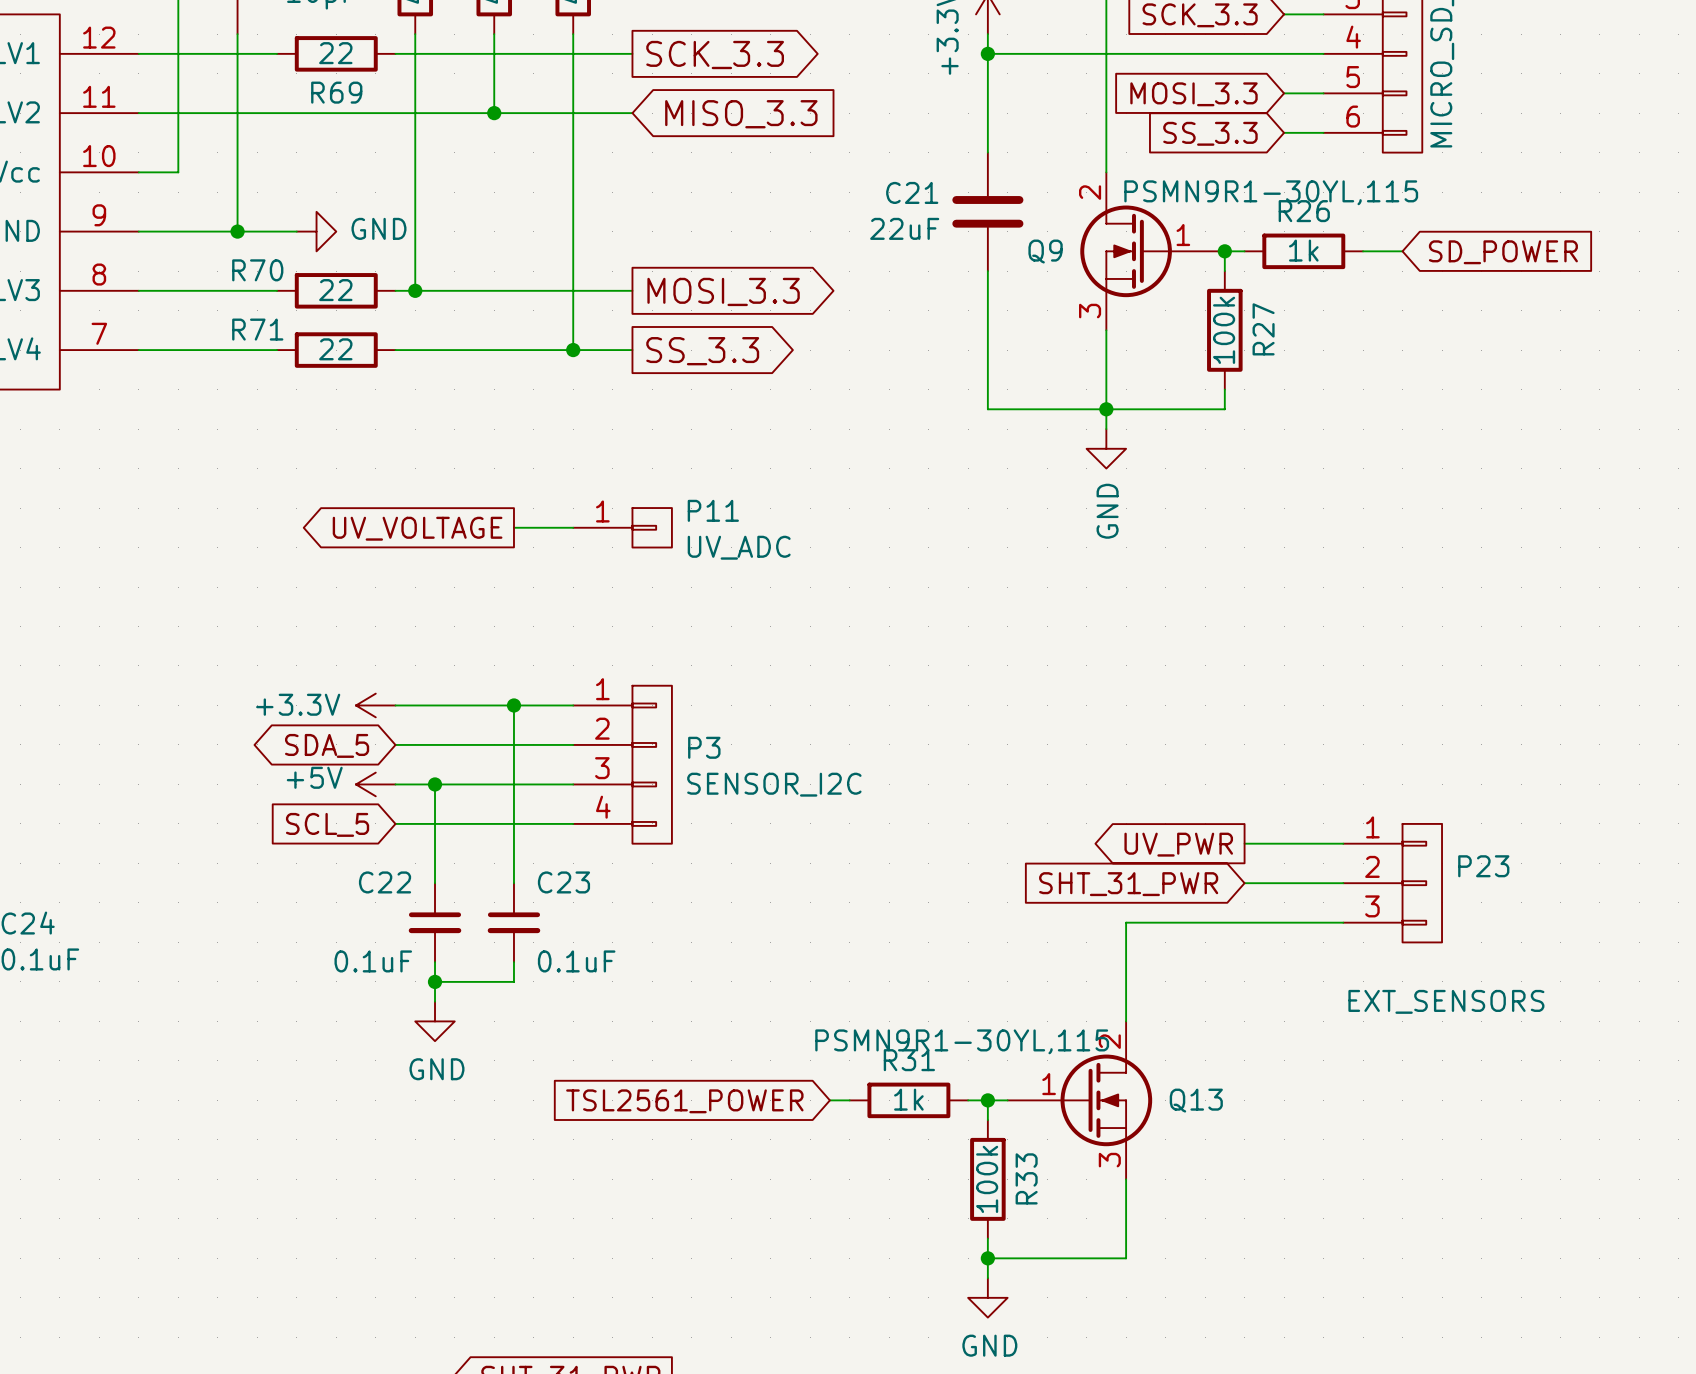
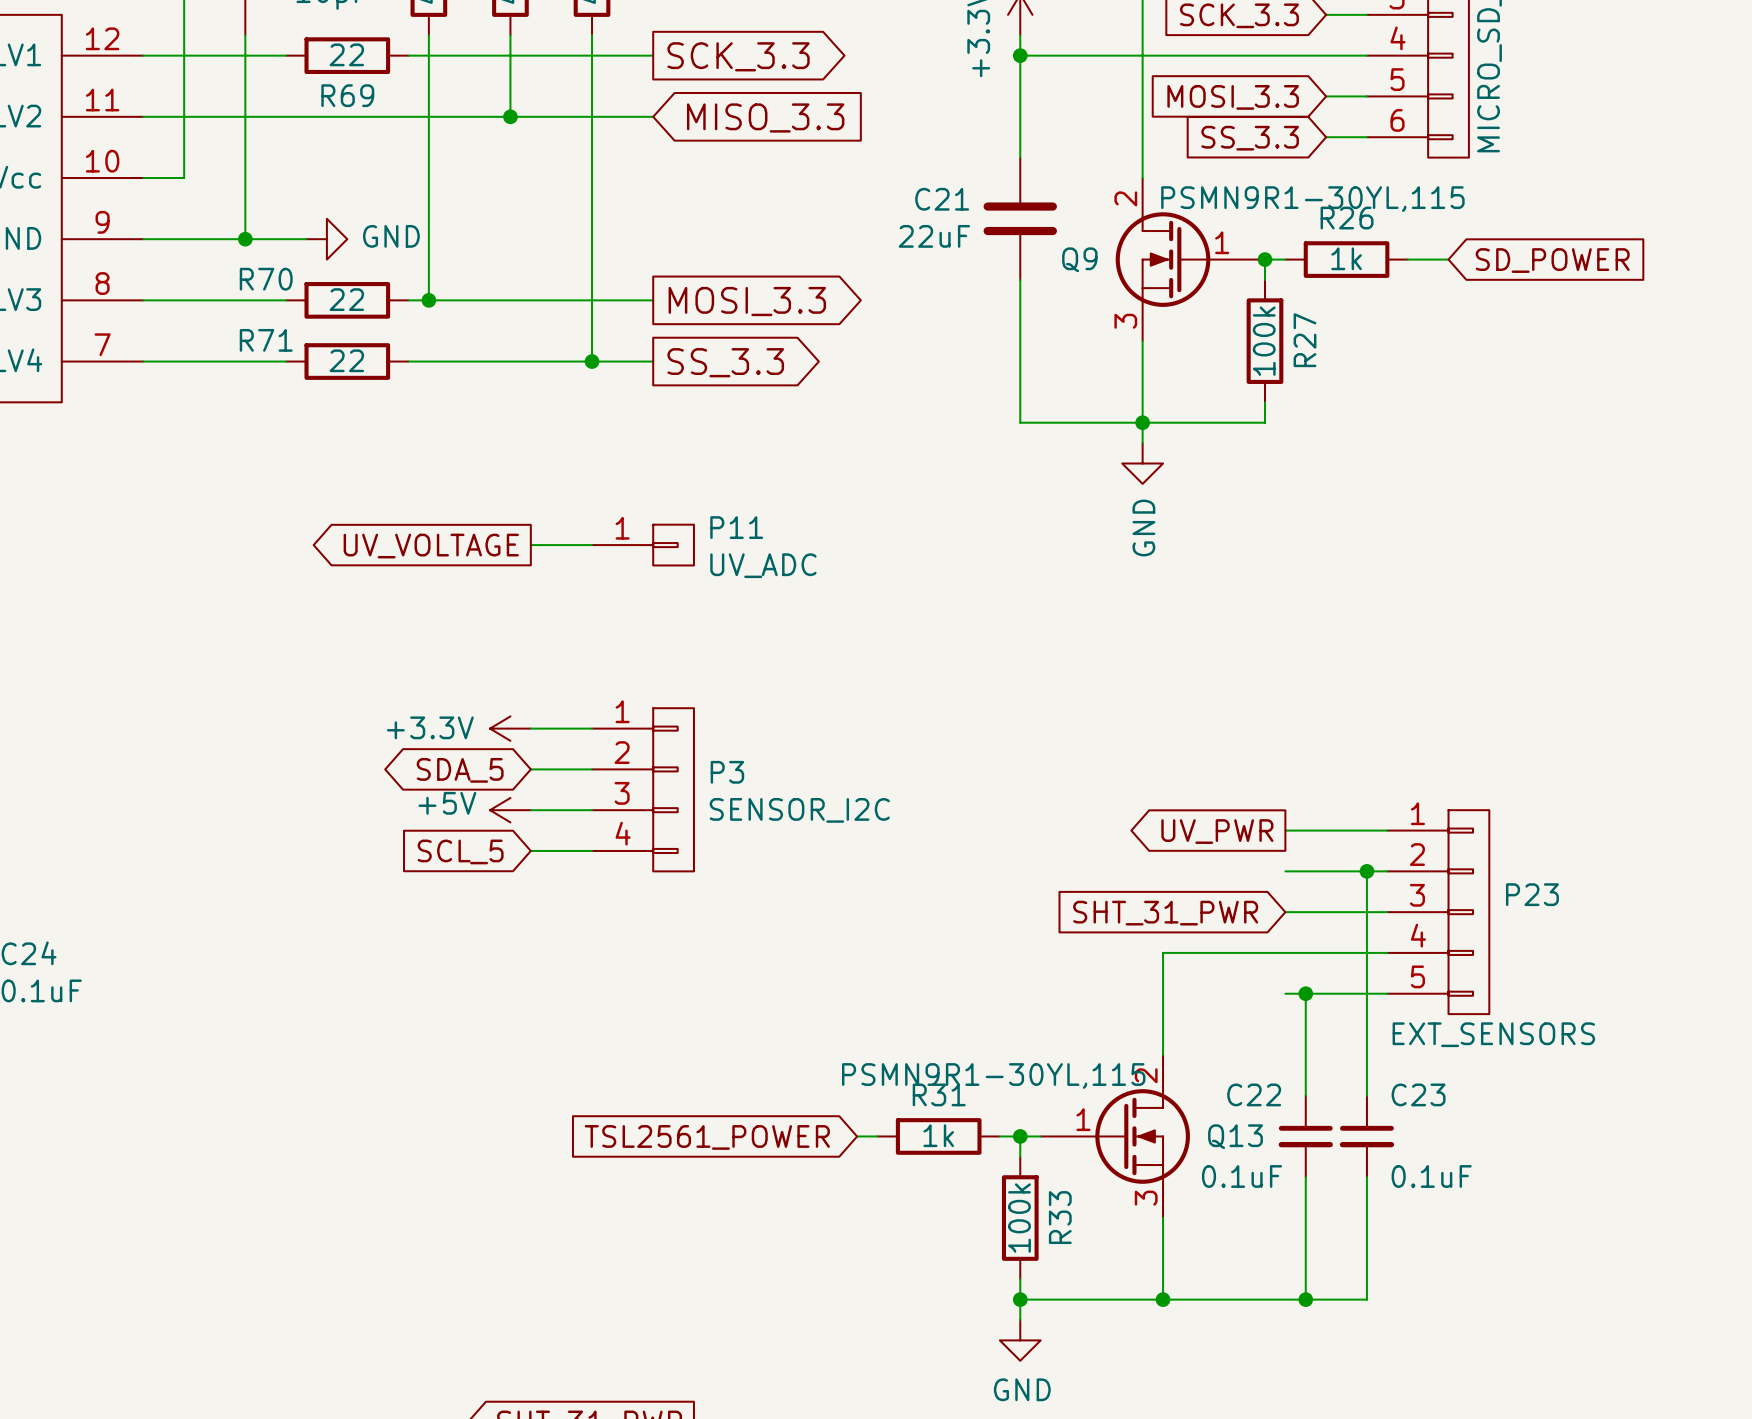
power symbol position: +3.3V (375, 705) -> +3.3V (510, 728)
wire: (395, 705) (513, 705) (513, 883) -> none
junction: (513, 705) -> none
wire: (395, 744) (513, 744) -> none
global label position: SDA_5 (327, 745) -> SDA_5 (460, 770)
power symbol position: +5V (375, 784) -> +5V (510, 810)
wire: (395, 784) (513, 784) -> none
wire: (435, 784) (435, 883) -> none
junction: (435, 784) -> none
wire: none -> (1285, 830) (1387, 830)
wire: (395, 823) (513, 823) -> none
P23 symbol: [1343, 823, 1443, 943] -> [1387, 810, 1490, 1015]
global label position: SCL_5 (327, 824) -> SCL_5 (460, 851)
wire: none -> (1366, 871) (1366, 1095)
junction: none -> (1366, 871)
global label position: UV_PWR (1178, 844) -> UV_PWR (1217, 831)
C22 position: (435, 922) -> (1305, 1136)
C23 position: (513, 922) -> (1366, 1136)
wire: (435, 962) (435, 1001) -> none
wire: (513, 962) (513, 981) (435, 981) -> none
wire: none -> (1285, 993) (1387, 993)
wire: none -> (1305, 993) (1305, 1095)
junction: none -> (1305, 993)
junction: (435, 981) -> none
power symbol: GND (435, 1021) -> none
wire: none -> (1305, 1177) (1305, 1299)
wire: none -> (1366, 1177) (1366, 1299) (1163, 1299)
junction: none -> (1163, 1299)
junction: none -> (1305, 1299)

